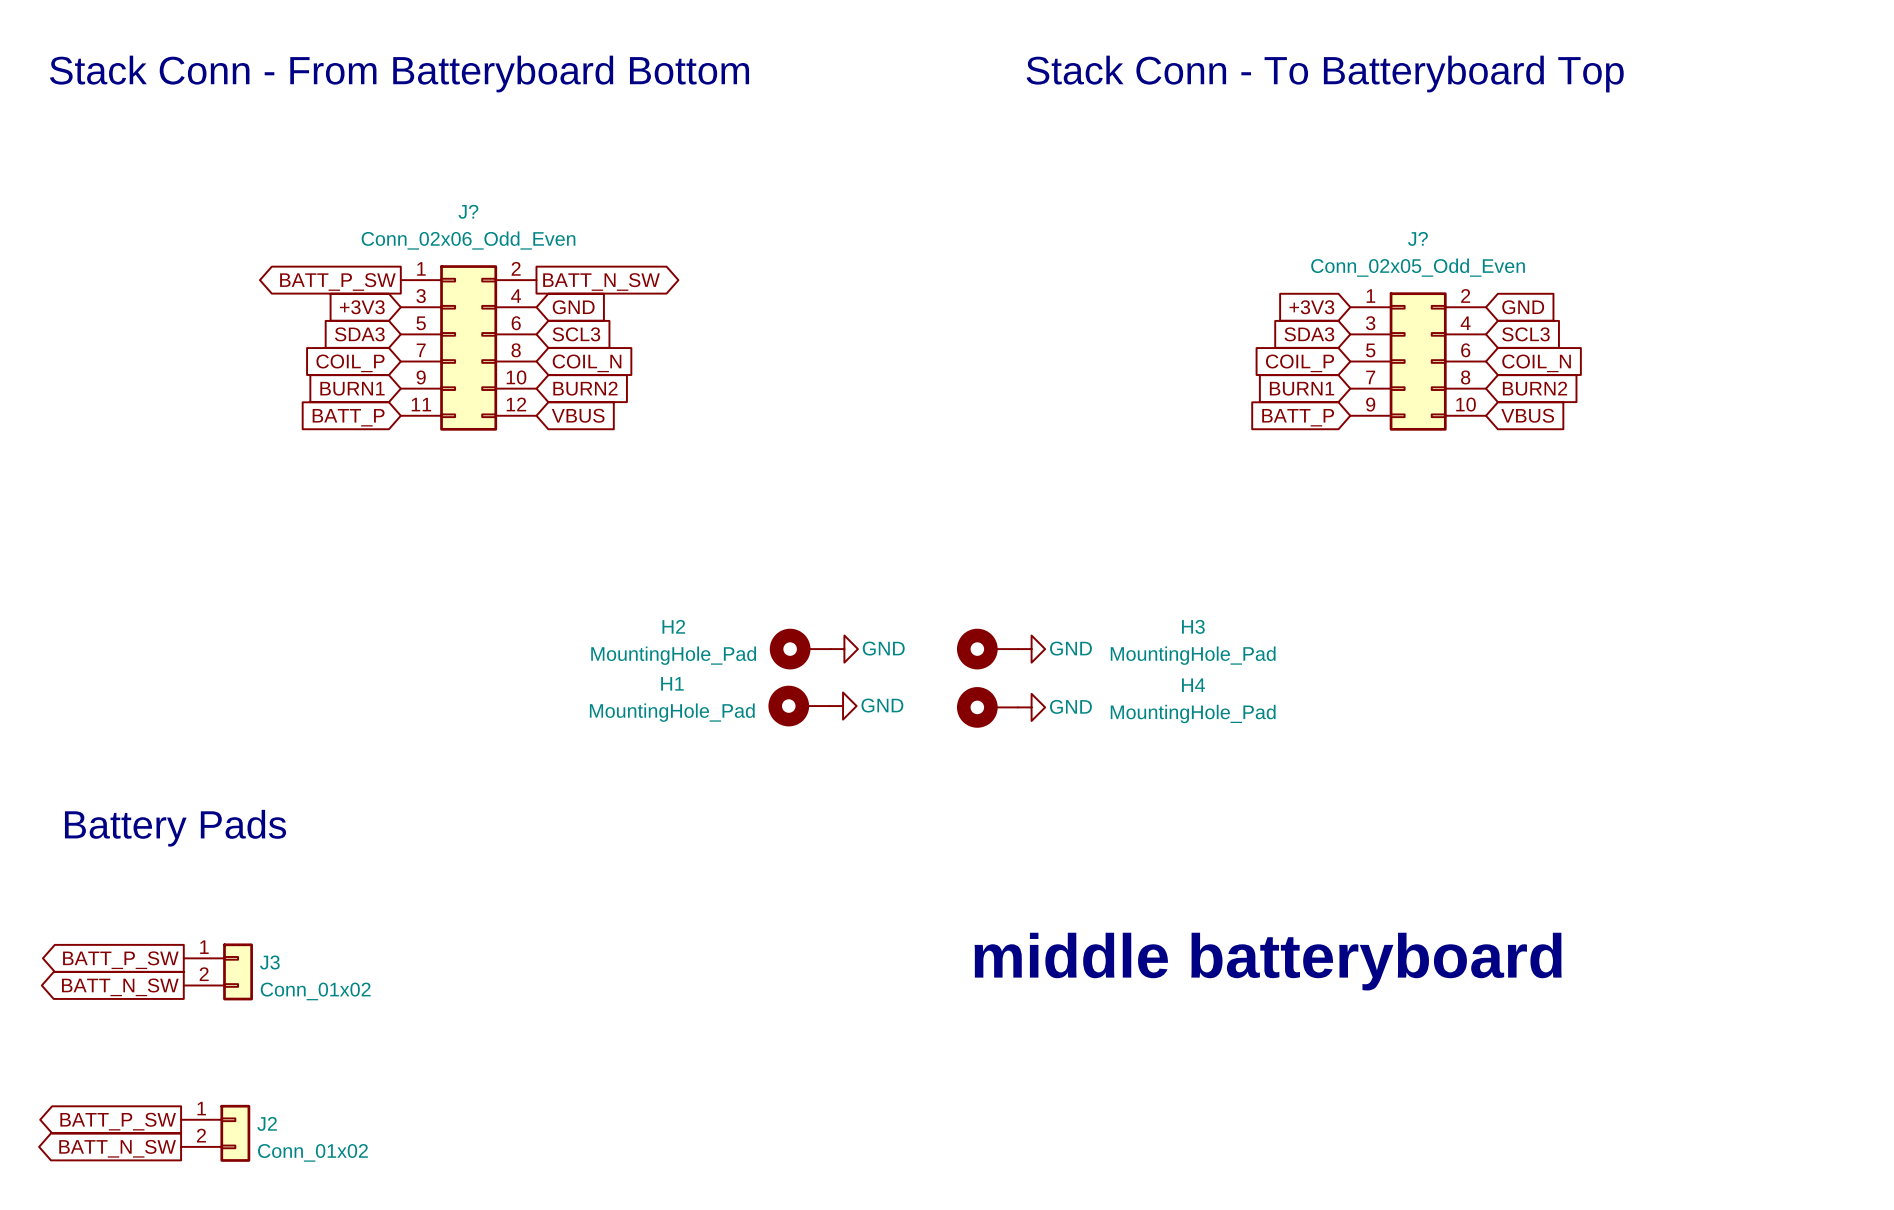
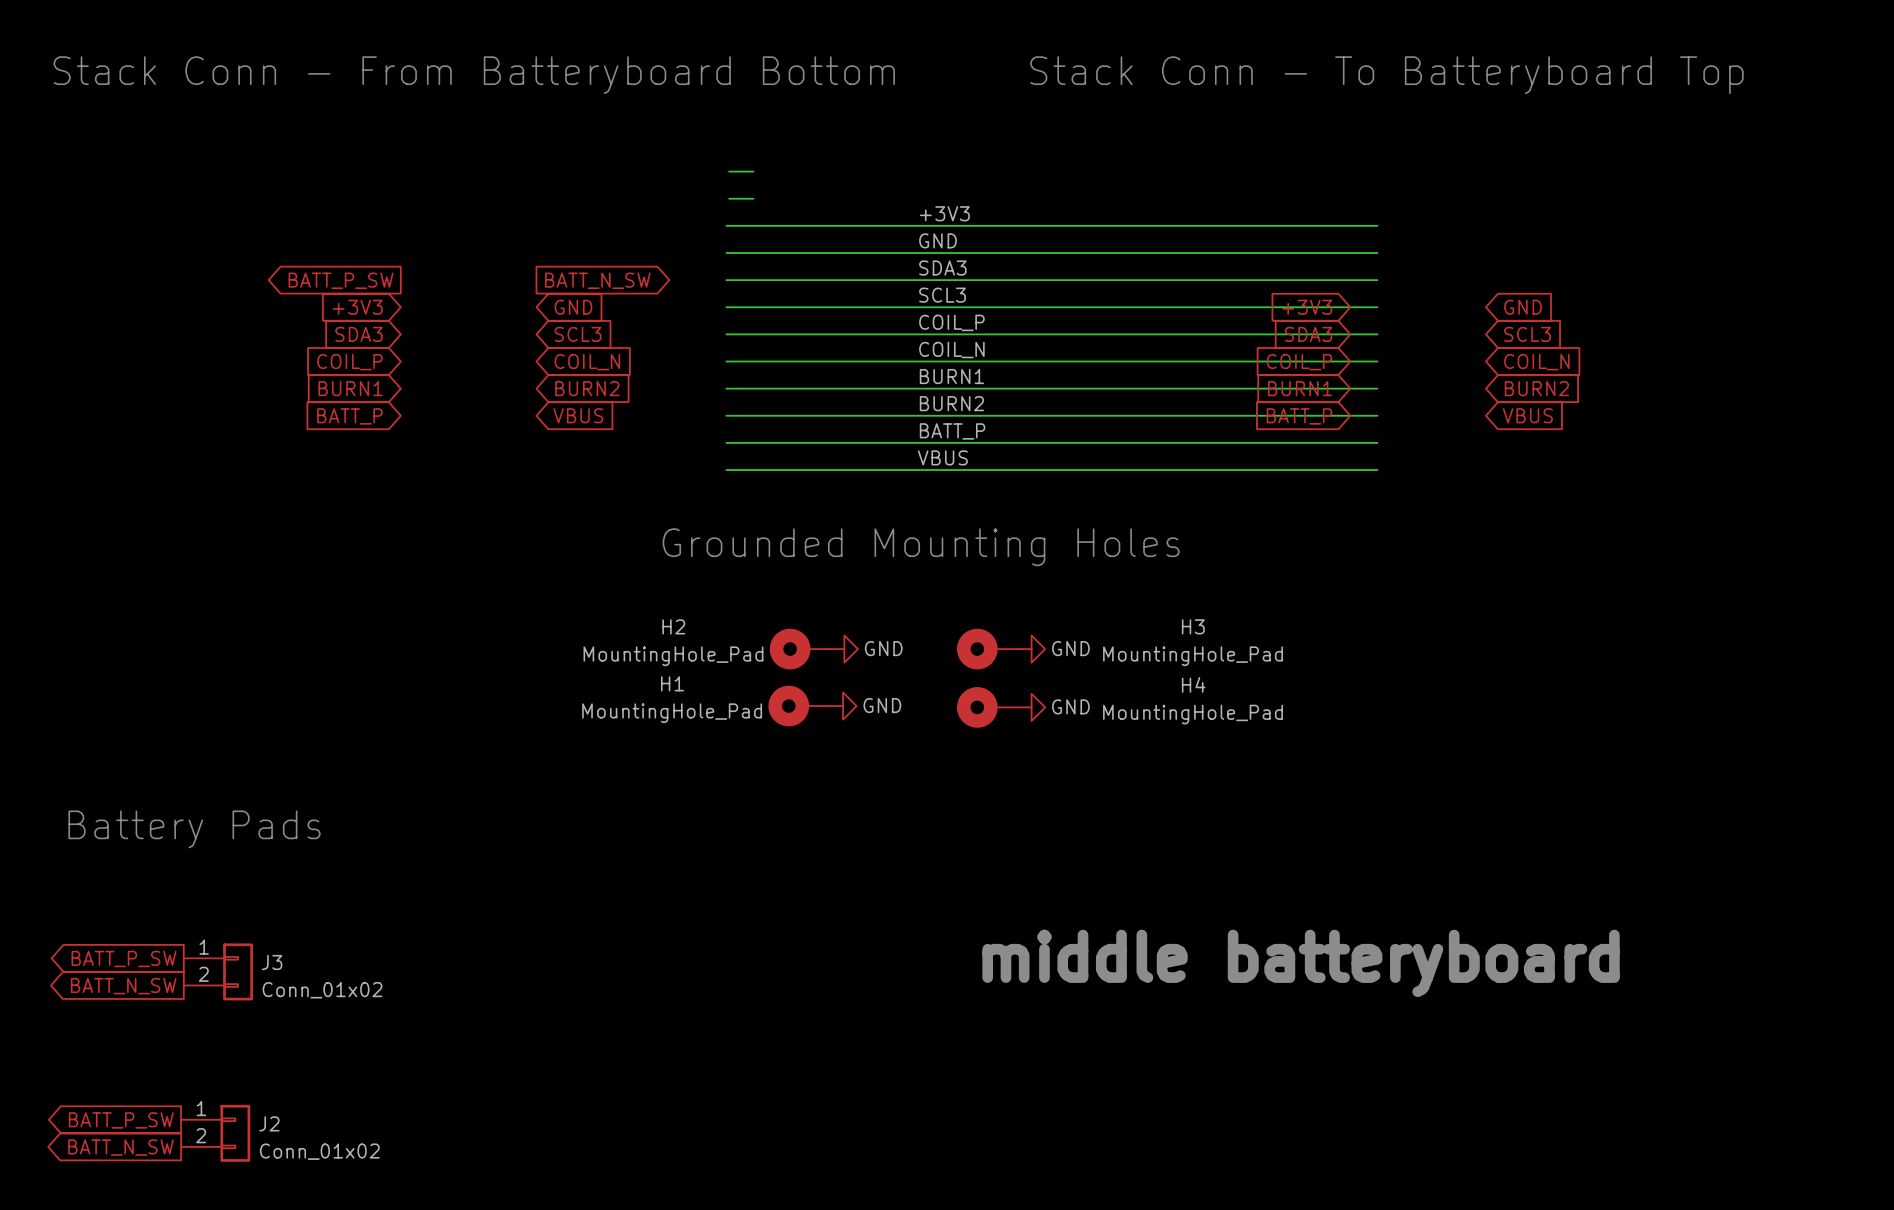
wire: none -> (729, 171) (753, 171)
wire: none -> (729, 198) (753, 198)
label: none -> +3V3 (944, 213)
wire: none -> (726, 225) (1377, 225)
label: none -> GND (938, 240)
wire: none -> (726, 252) (1377, 252)
label: none -> SDA3 (942, 268)
wire: none -> (726, 280) (1377, 280)
label: none -> SCL3 (942, 295)
wire: none -> (726, 307) (1377, 307)
label: none -> COIL_P (951, 322)
wire: none -> (726, 334) (1377, 334)
J?: Conn_02x06_Odd_Even (468, 347) -> none
label: none -> COIL_N (951, 350)
wire: none -> (726, 361) (1377, 361)
J?: Conn_02x05_Odd_Even (1418, 361) -> none
label: none -> BURN1 (951, 376)
wire: none -> (726, 388) (1377, 388)
label: none -> BURN2 (951, 403)
wire: none -> (726, 415) (1377, 415)
label: none -> BATT_P (952, 431)
wire: none -> (726, 442) (1377, 442)
label: none -> VBUS (942, 457)
wire: none -> (726, 470) (1377, 470)
text: none -> Grounded Mounting Holes (921, 547)

